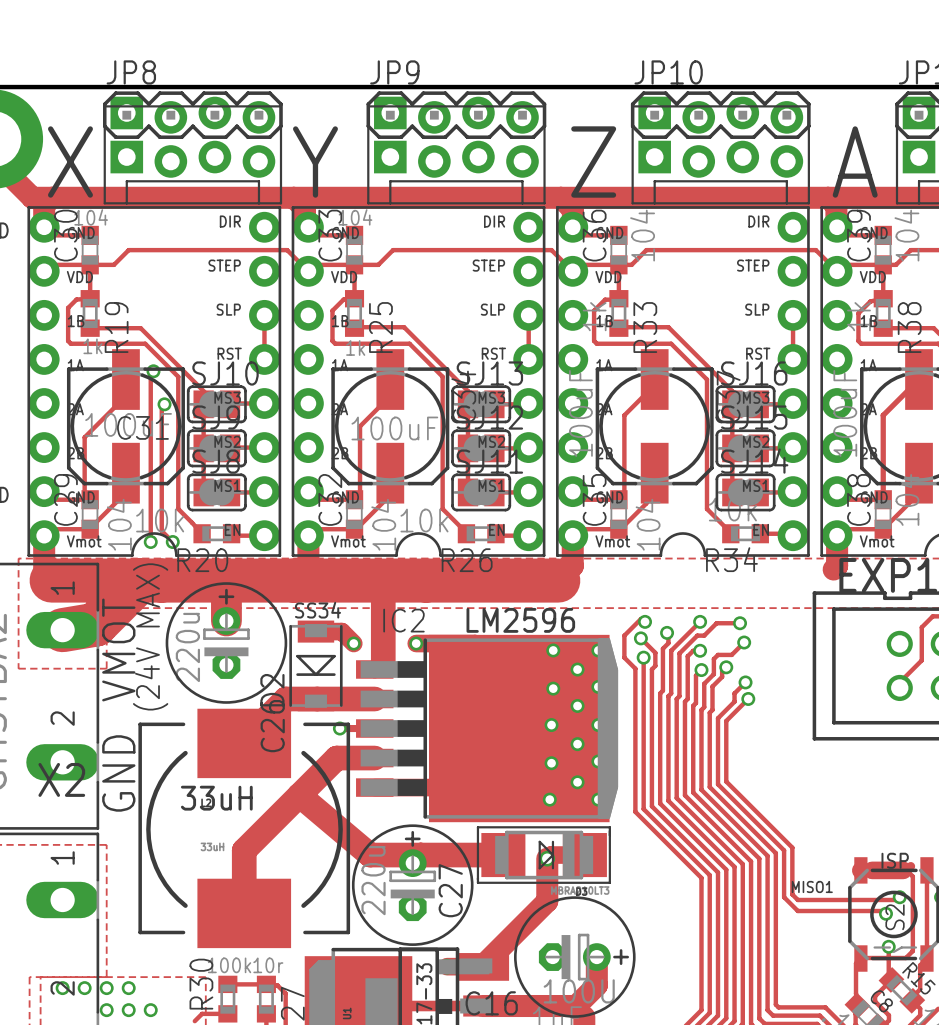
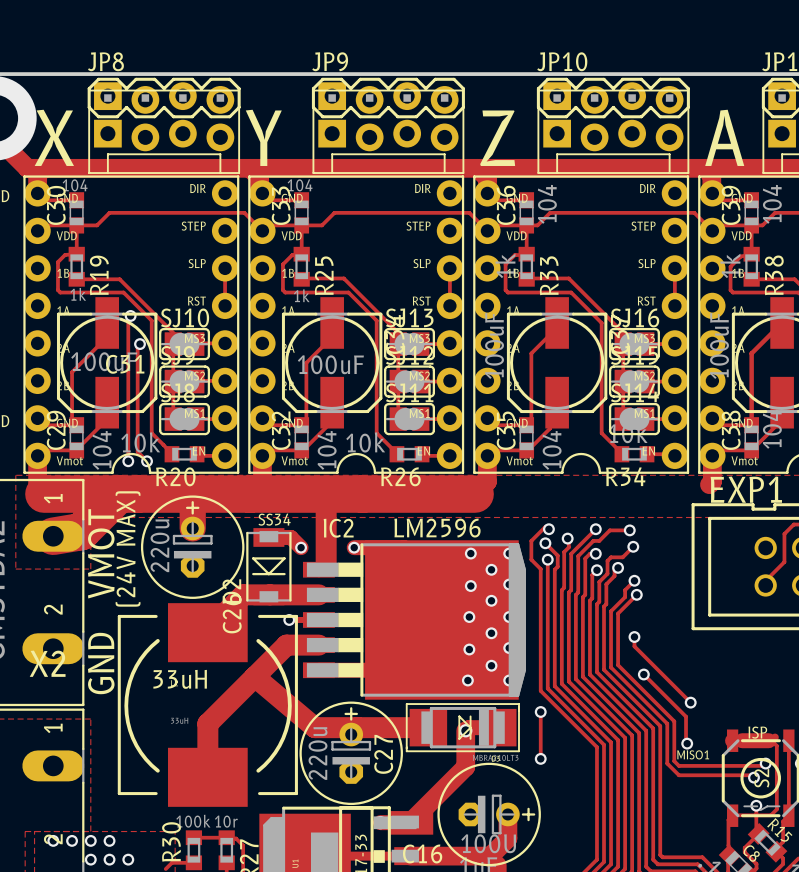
track: none -> (634, 637) (634, 646) (690, 702)
via: none -> (634, 637)
track: none -> (643, 674) (686, 716) (687, 743)
via: none -> (643, 674)
via: none -> (690, 702)
track: none -> (540, 712) (540, 758)
via: none -> (540, 712)
via: none -> (687, 743)
via: none -> (540, 758)

